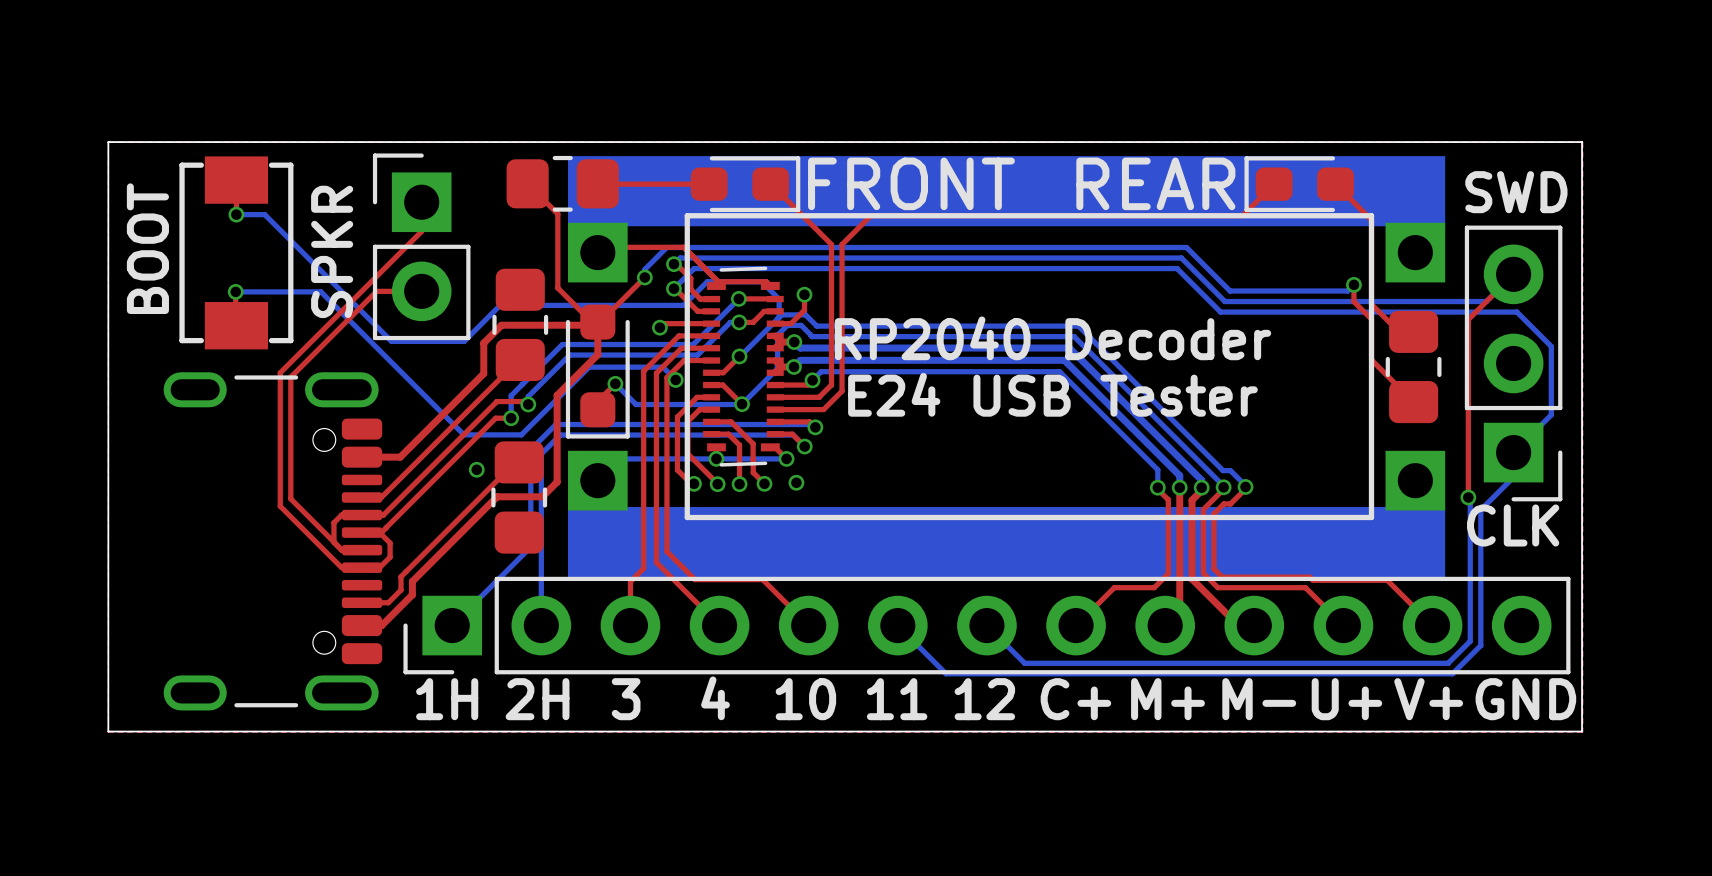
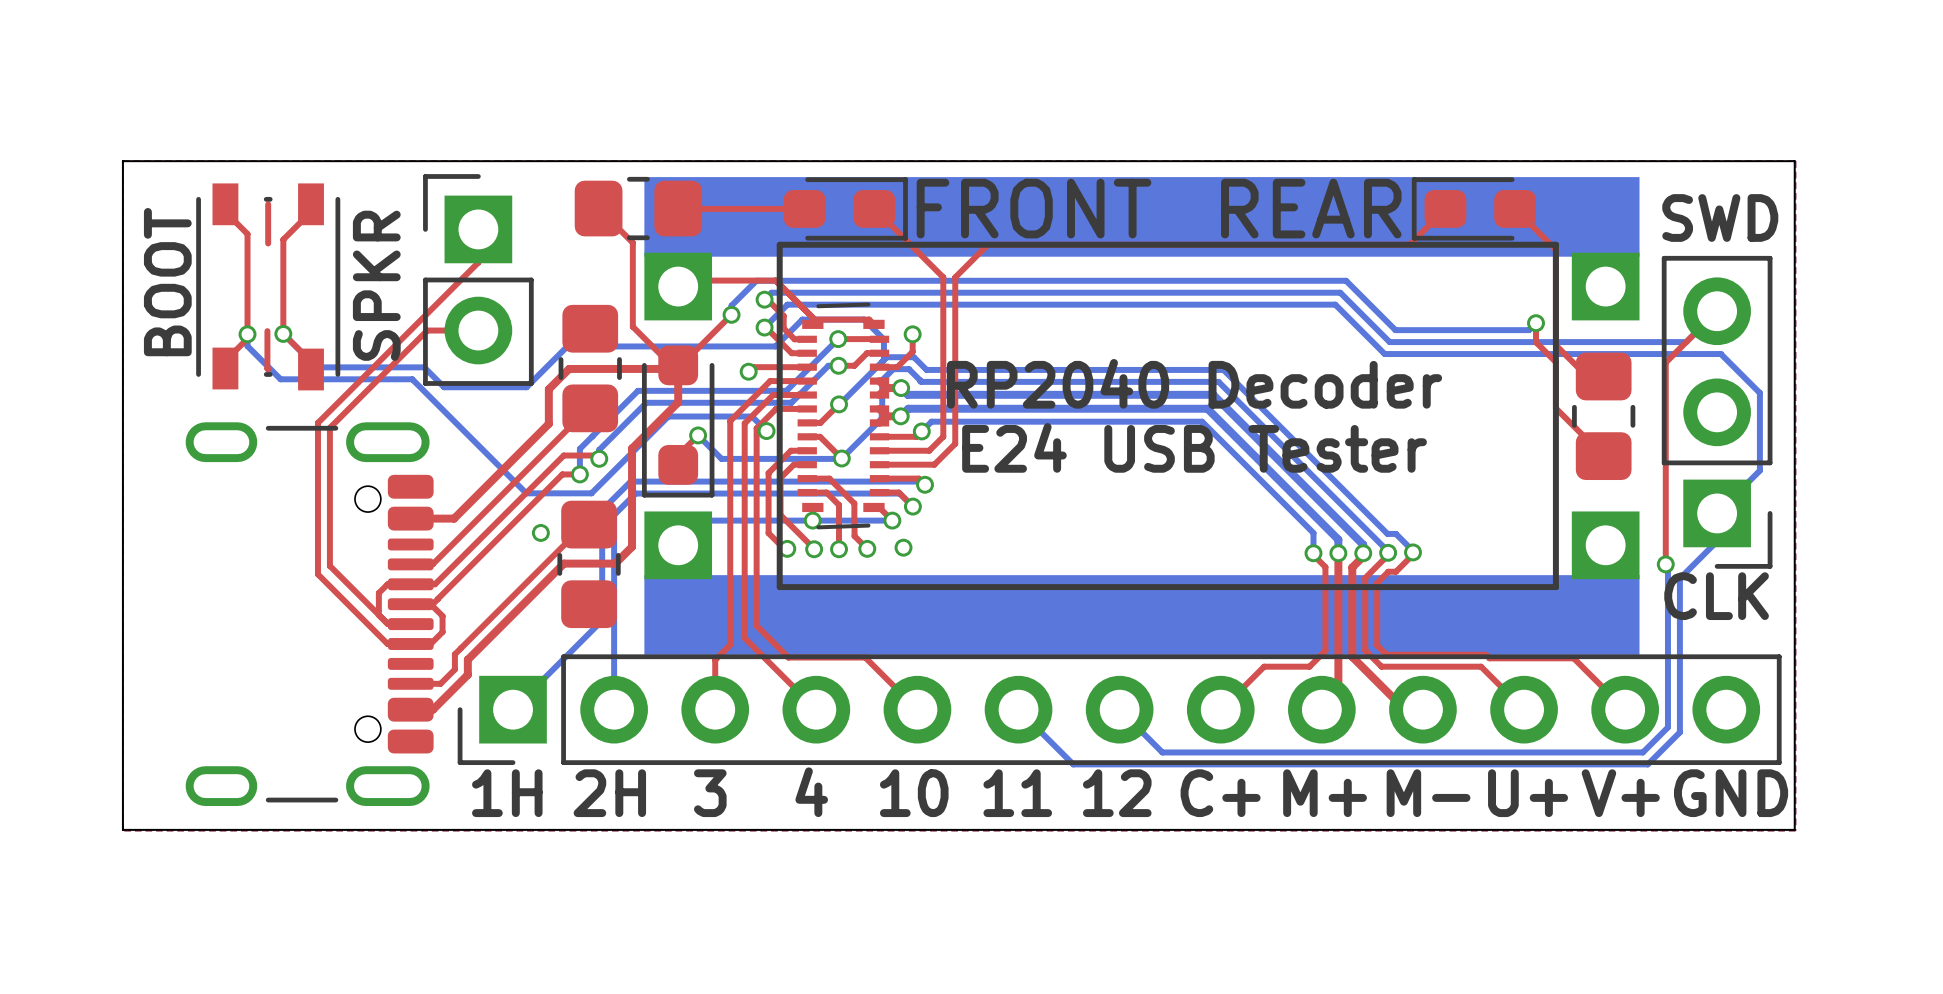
part footprint: [179, 156, 294, 350] -> [196, 183, 341, 391]
top track: none -> (226, 204) (225, 204) (225, 211) (247, 234) (247, 338) (225, 360) (225, 368)
top track: none -> (311, 204) (311, 211) (283, 239) (283, 333) (311, 361) (311, 369)
bottom track: (236, 214) (264, 214) (373, 323) -> (283, 333) (316, 367) (424, 367)
via: (236, 214) -> none
bottom track: (235, 291) (320, 291) (363, 334) -> (247, 334) (247, 346) (280, 379) (412, 379)
via position: (235, 291) -> (283, 333)
via: none -> (247, 334)

